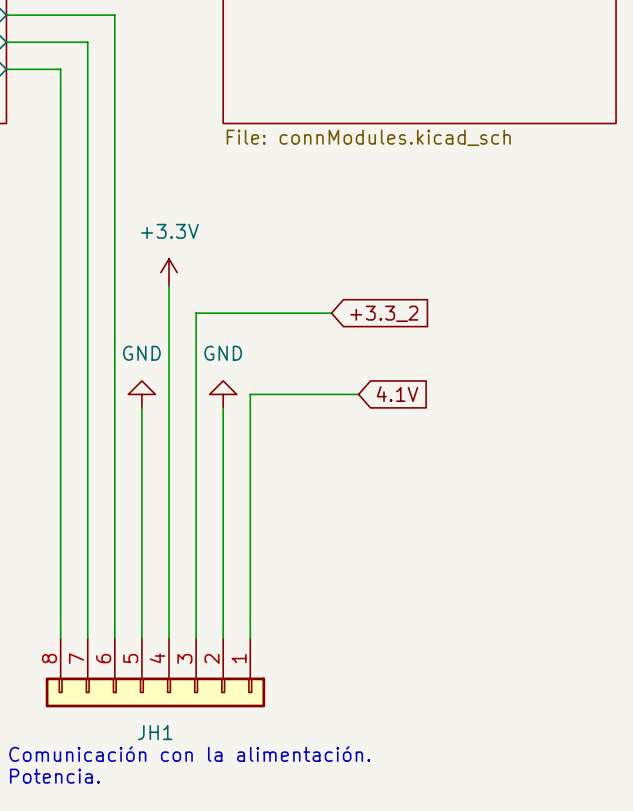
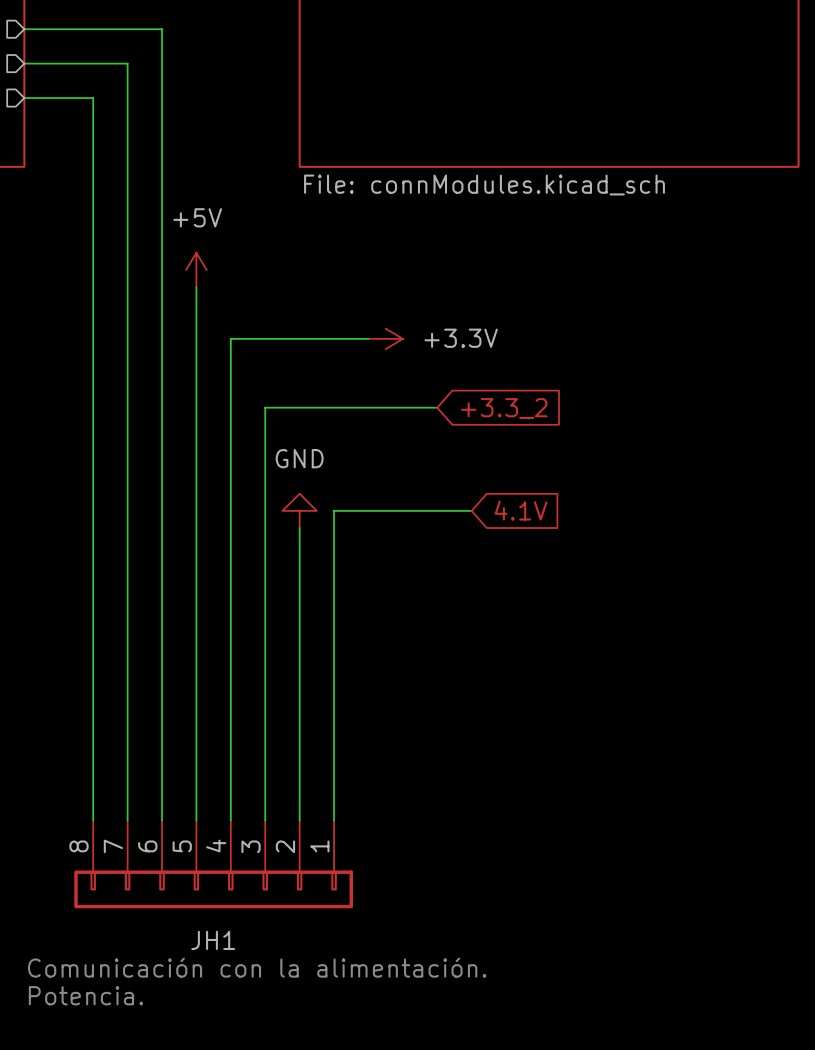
power symbol: none -> +5V (196, 270)
wire: none -> (196, 287) (196, 528)
power symbol text position: +3.3V (169, 231) -> +3.3V (461, 338)
wire: none -> (368, 338) (230, 338) (230, 373)
power symbol rotation: 0° (169, 272) -> 90° clockwise (385, 338)
power symbol position: +3.3V (169, 272) -> +3.3V (385, 338)
power symbol: GND (141, 394) -> none

